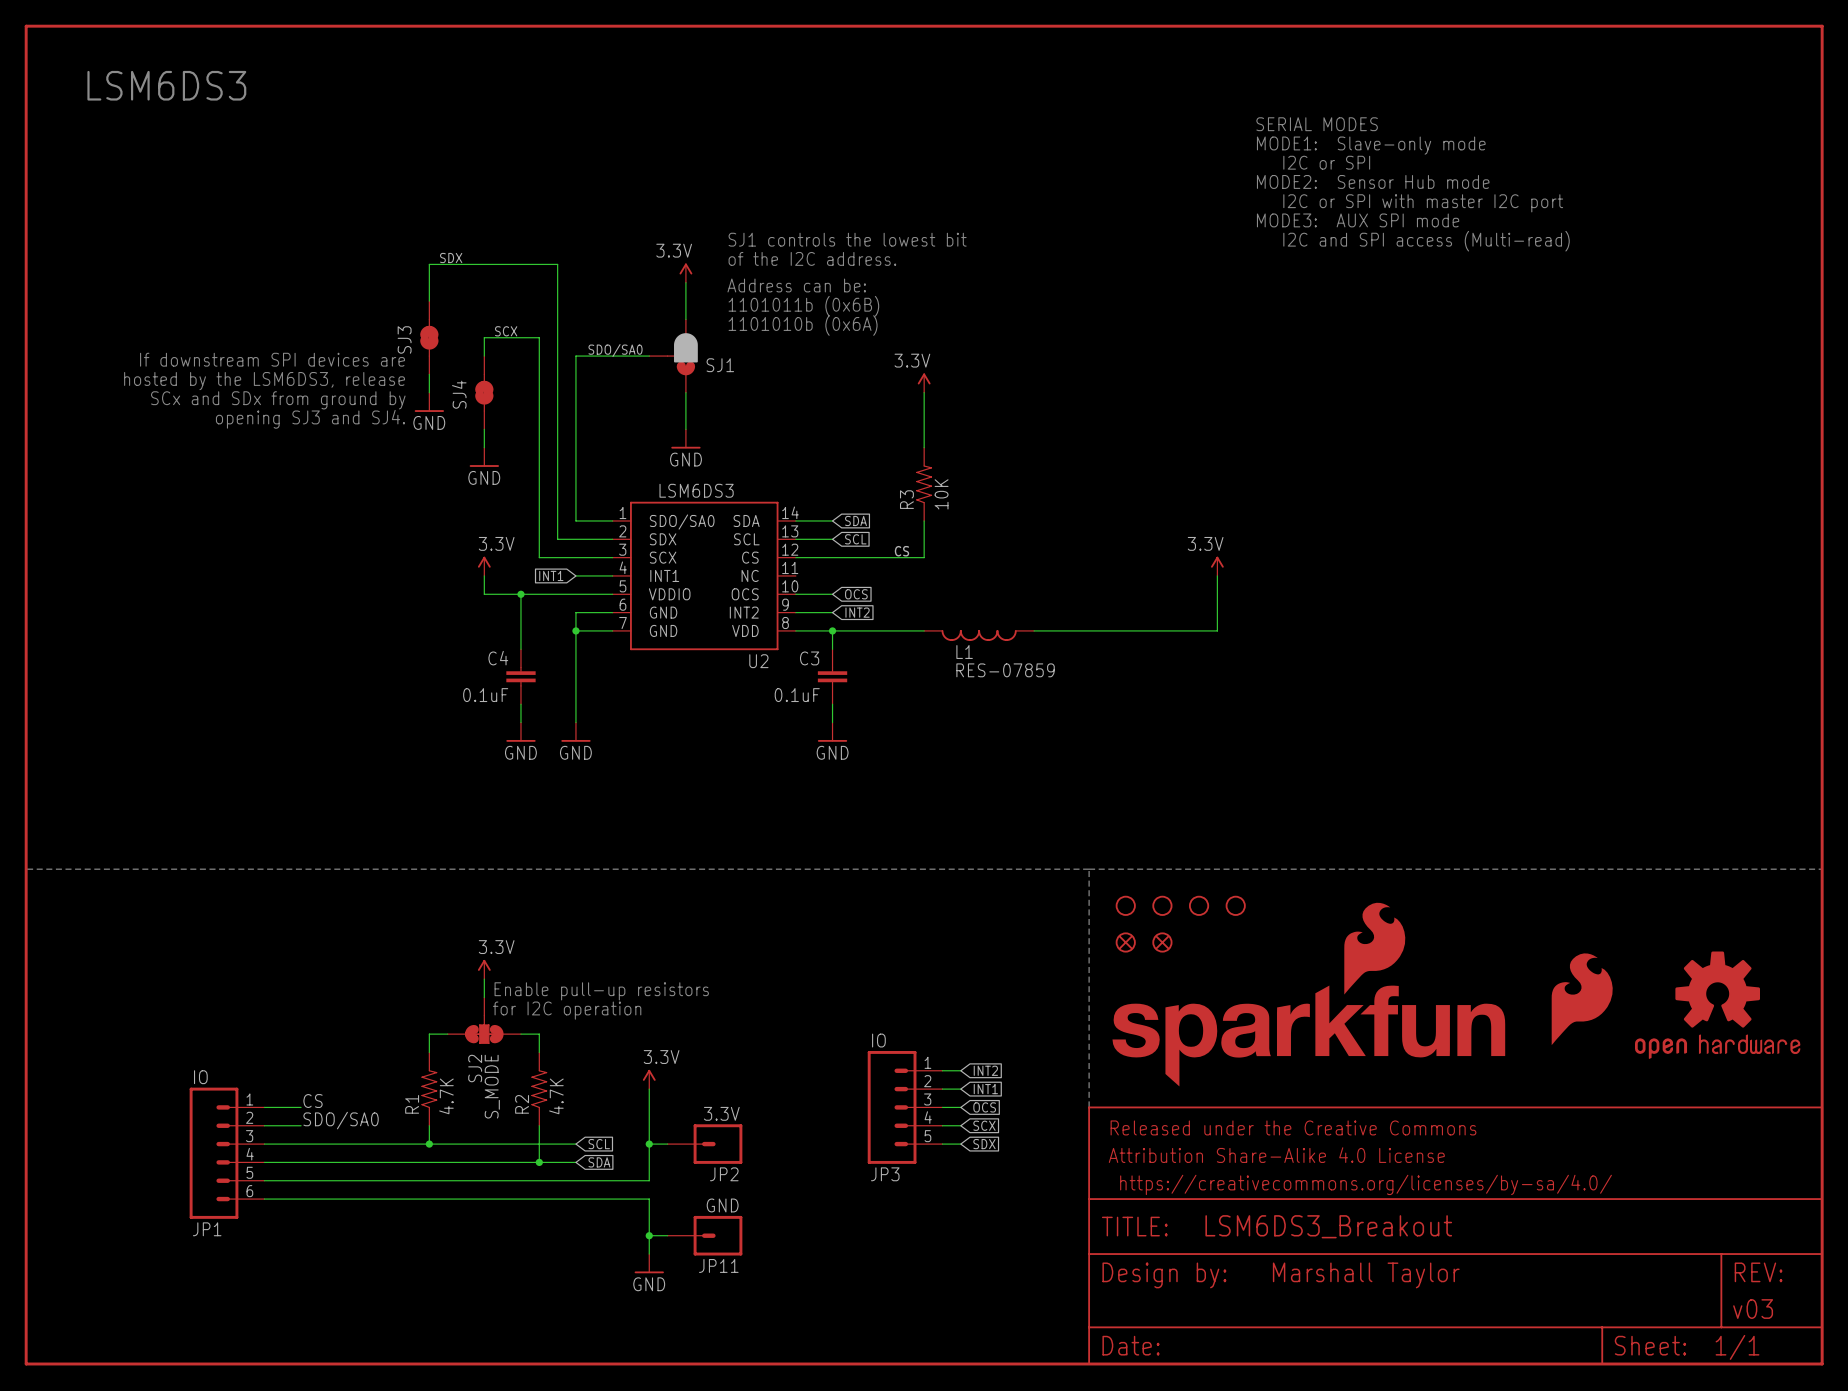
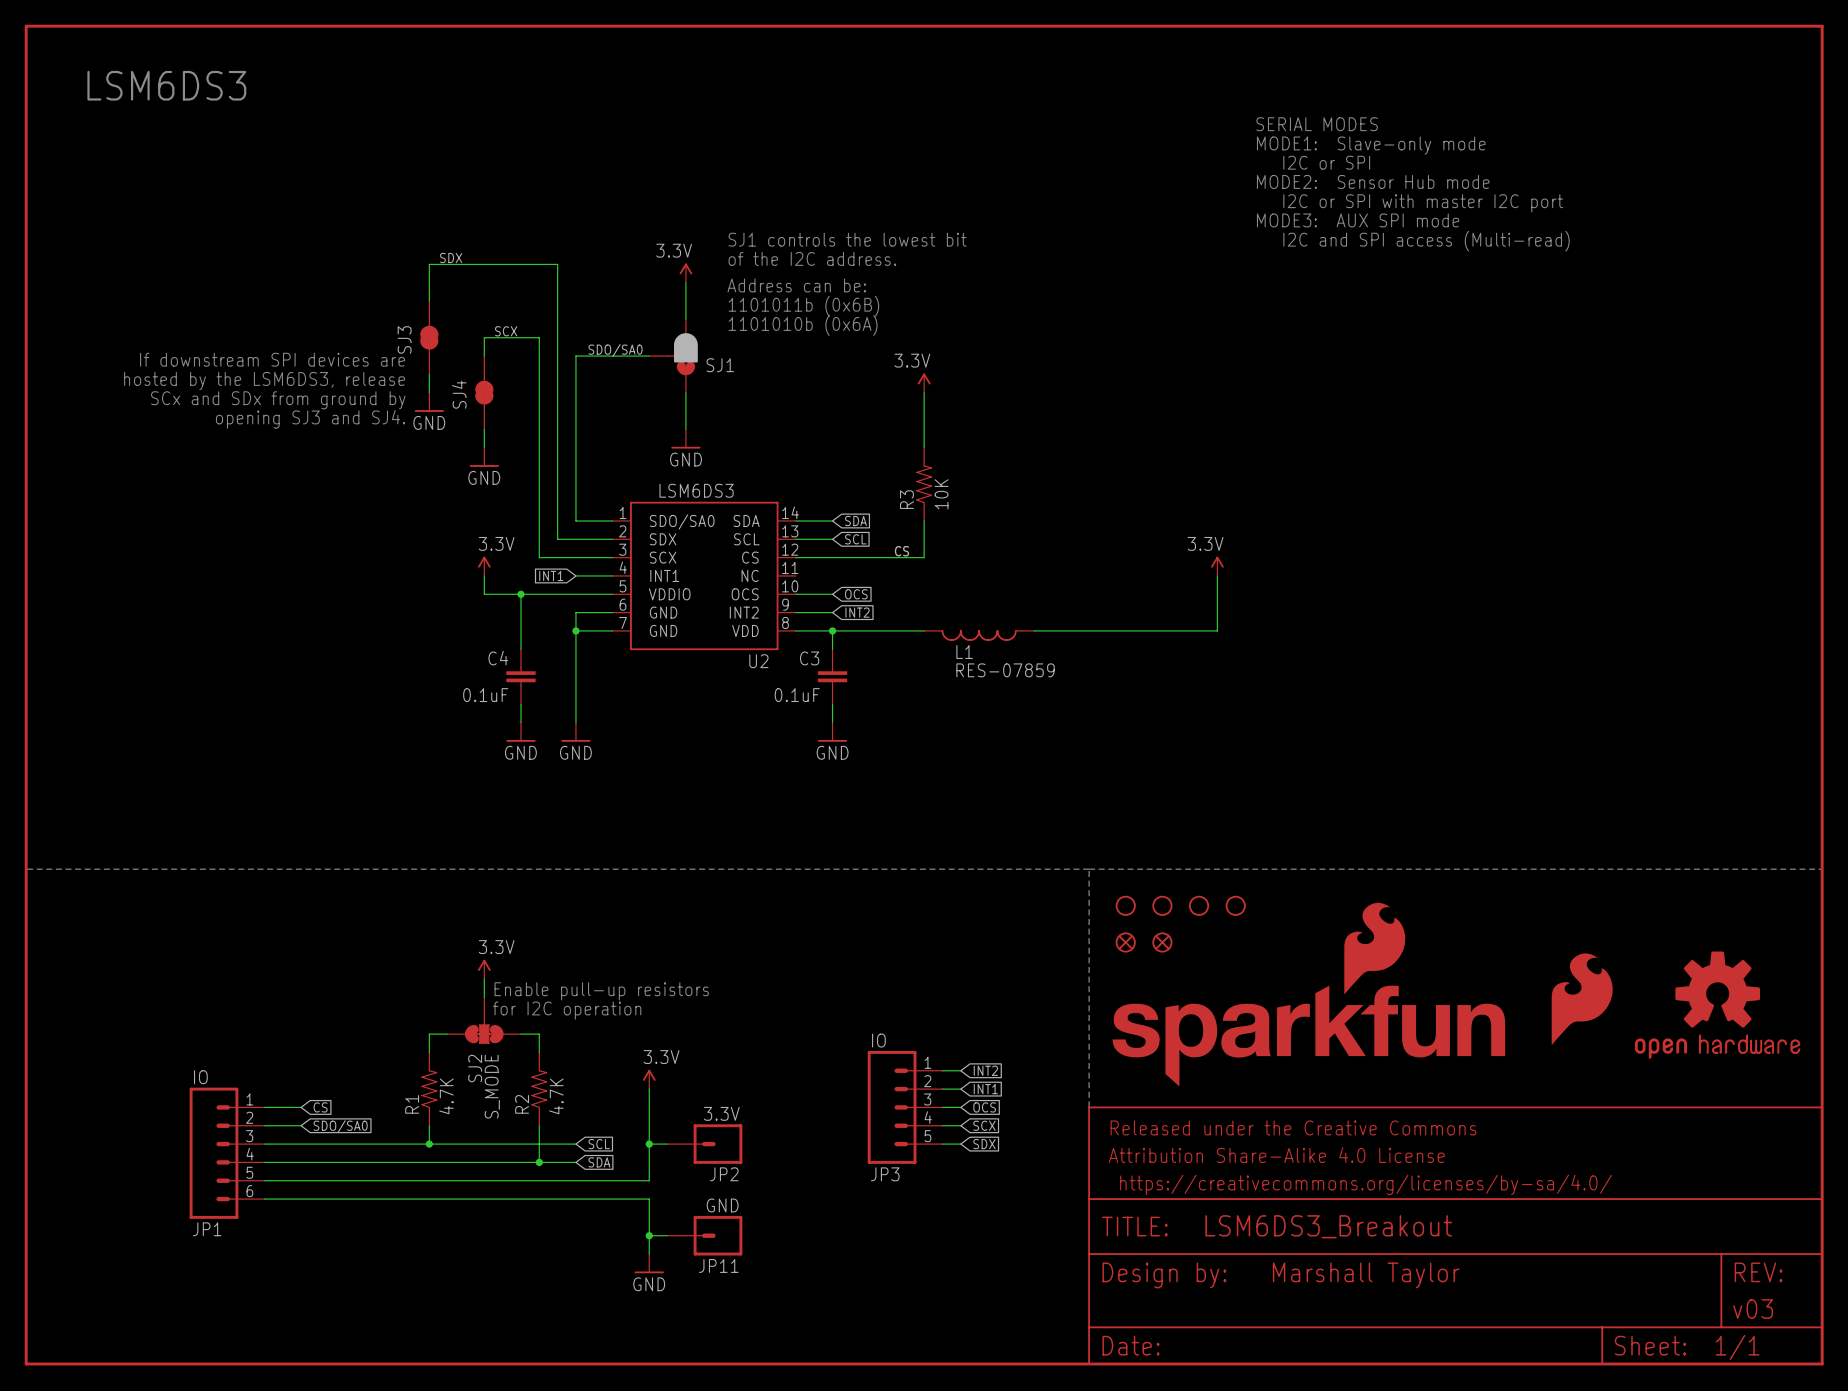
label: CS (313, 1101) -> none
global label: none -> CS (320, 1107)
label: SDO/SA0 (341, 1120) -> none
global label: none -> SDO/SA0 (340, 1126)

